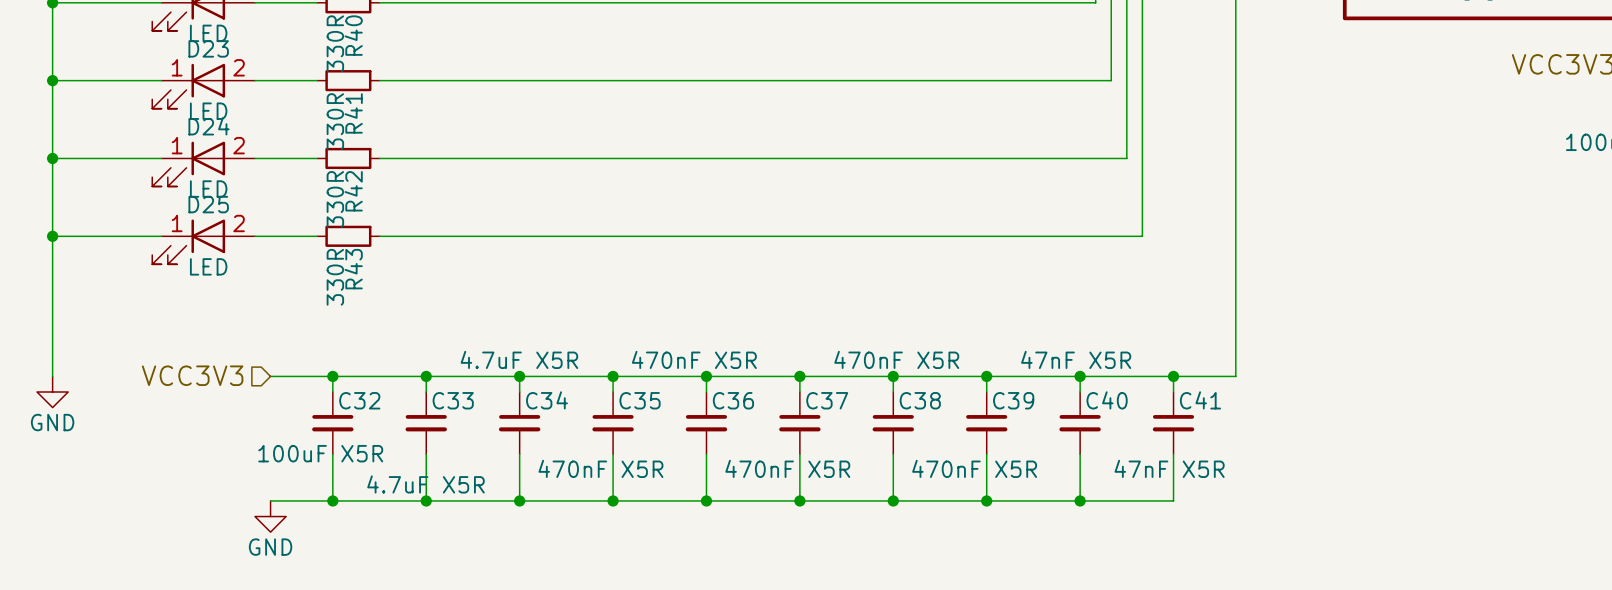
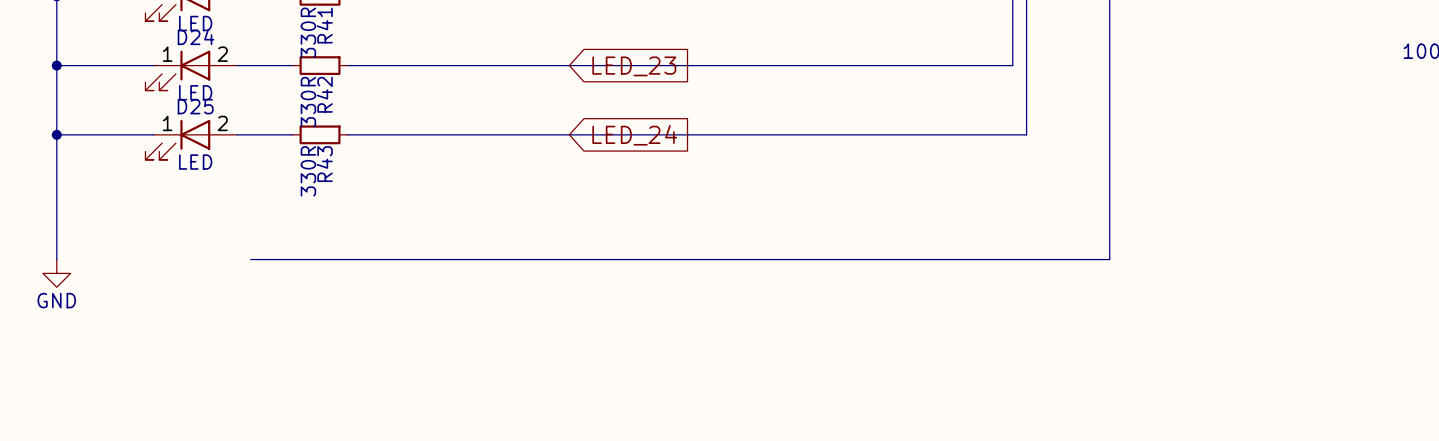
global label: none -> LED_23 (634, 66)
global label: none -> LED_24 (634, 135)
hierarchical label: VCC3V3 (192, 375) -> none
wire: (332, 376) (332, 392) -> none
junction: (332, 376) -> none
wire: (426, 376) (426, 392) -> none
junction: (426, 376) -> none
wire: (519, 376) (519, 392) -> none
junction: (519, 376) -> none
wire: (613, 376) (613, 392) -> none
junction: (613, 376) -> none
wire: (706, 376) (706, 392) -> none
junction: (706, 376) -> none
wire: (799, 376) (799, 392) -> none
junction: (799, 376) -> none
wire: (893, 376) (893, 392) -> none
junction: (893, 376) -> none
wire: (986, 376) (986, 392) -> none
junction: (986, 376) -> none
wire: (1080, 376) (1080, 392) -> none
junction: (1080, 376) -> none
wire: (1173, 376) (1173, 392) -> none
junction: (1173, 376) -> none
C32: 100uF X5R (332, 423) -> none
C33: 4.7uF X5R (426, 423) -> none
C34: 4.7uF X5R (519, 423) -> none
C35: 470nF X5R (613, 423) -> none
C36: 470nF X5R (706, 423) -> none
C37: 470nF X5R (799, 423) -> none
C38: 470nF X5R (893, 423) -> none
C39: 470nF X5R (986, 423) -> none
C40: 47nF X5R (1080, 423) -> none
C41: 47nF X5R (1173, 423) -> none
wire: (332, 454) (332, 500) -> none
wire: (426, 454) (426, 500) -> none
wire: (519, 454) (519, 500) -> none
wire: (613, 454) (613, 500) -> none
wire: (706, 454) (706, 500) -> none
wire: (799, 454) (799, 500) -> none
wire: (893, 454) (893, 500) -> none
wire: (986, 454) (986, 500) -> none
wire: (1080, 454) (1080, 500) -> none
wire: (1173, 454) (1173, 500) (270, 500) -> none
junction: (332, 500) -> none
junction: (426, 500) -> none
junction: (519, 500) -> none
junction: (613, 500) -> none
junction: (706, 500) -> none
junction: (799, 500) -> none
junction: (893, 500) -> none
junction: (986, 500) -> none
junction: (1080, 500) -> none
power symbol: GND (270, 516) -> none

